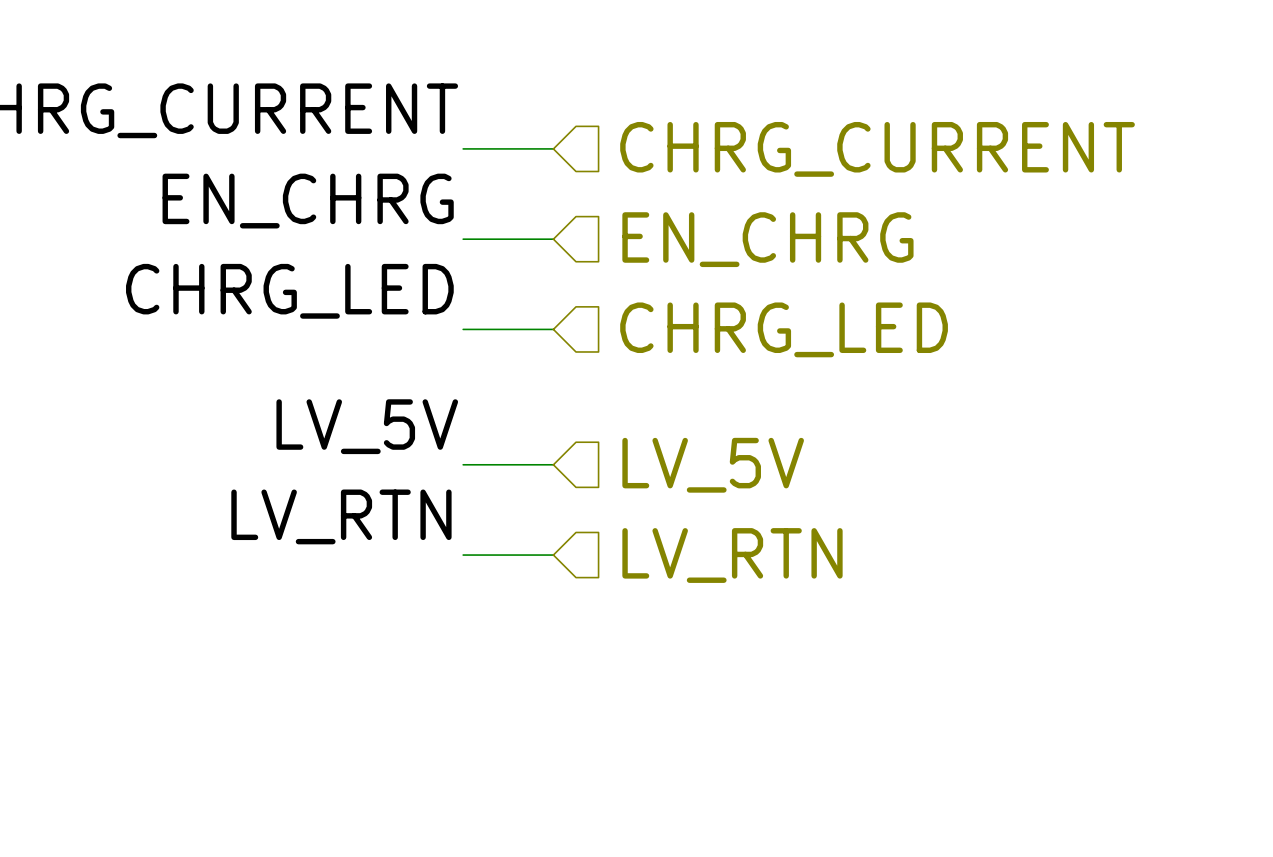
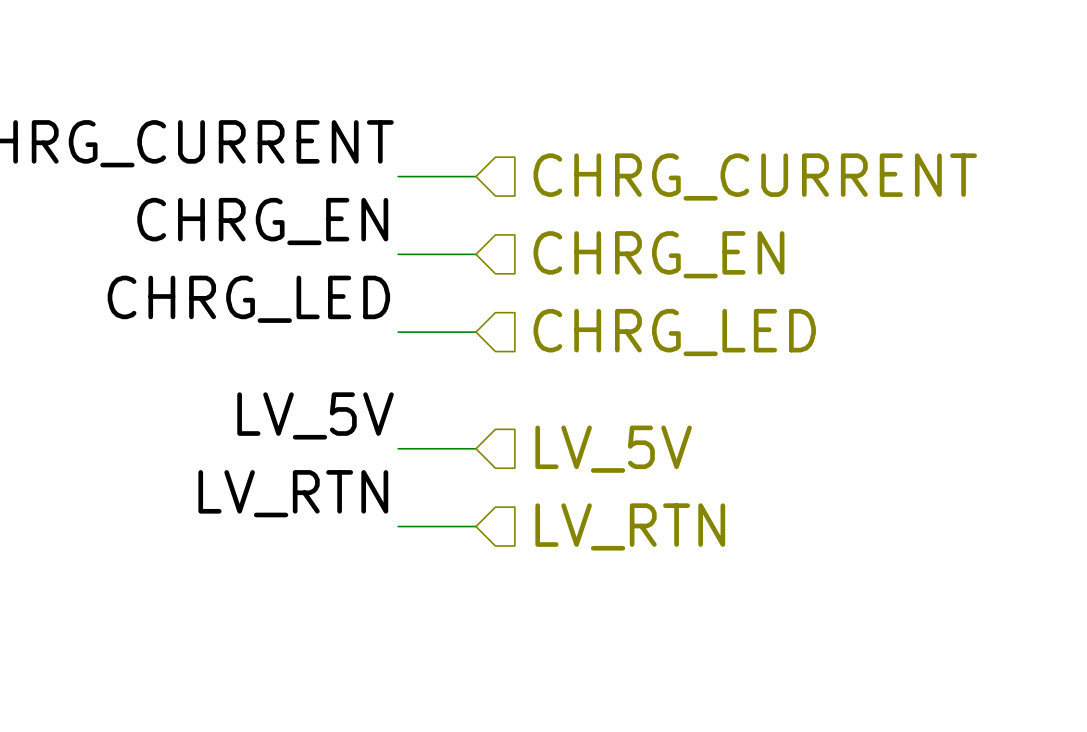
label: EN_CHRG (308, 201) -> CHRG_EN (262, 221)
hierarchical label: EN_CHRG (767, 239) -> CHRG_EN (658, 254)

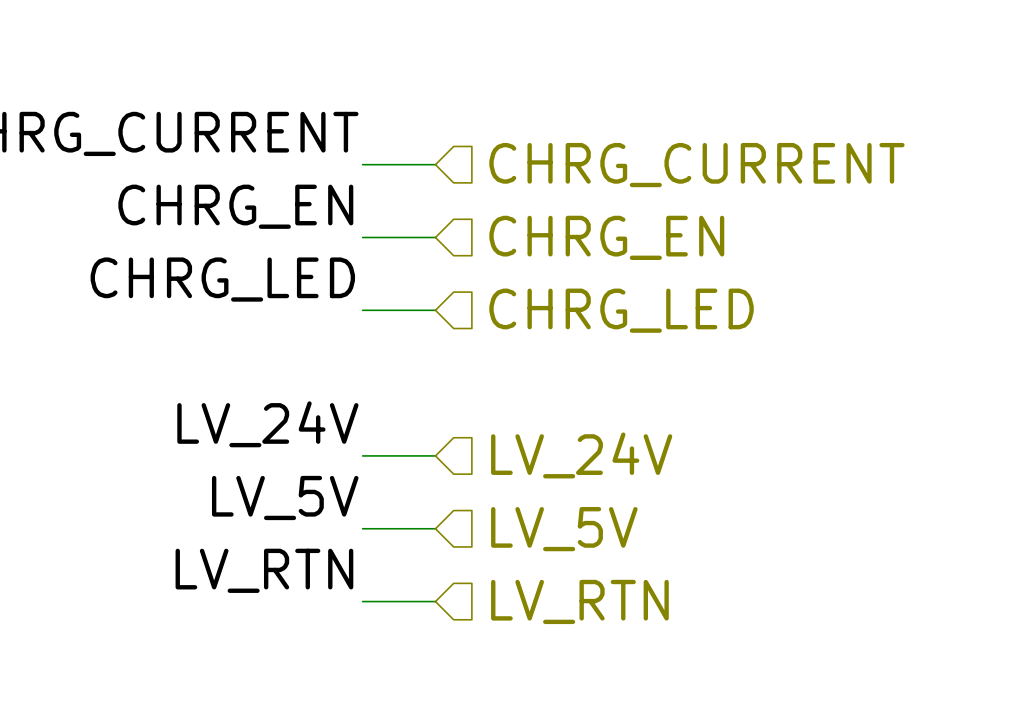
label position: LV_5V (315, 415) -> LV_5V (285, 498)
wire: (398, 448) (475, 448) -> (362, 455) (435, 455)
hierarchical label position: LV_5V (613, 449) -> LV_5V (564, 529)
label: none -> LV_24V (267, 424)
hierarchical label: none -> LV_24V (581, 455)
label position: LV_RTN (293, 493) -> LV_RTN (264, 570)
wire: (398, 526) (475, 526) -> (362, 528) (435, 528)
hierarchical label position: LV_RTN (630, 526) -> LV_RTN (579, 601)
wire: none -> (362, 601) (435, 601)

